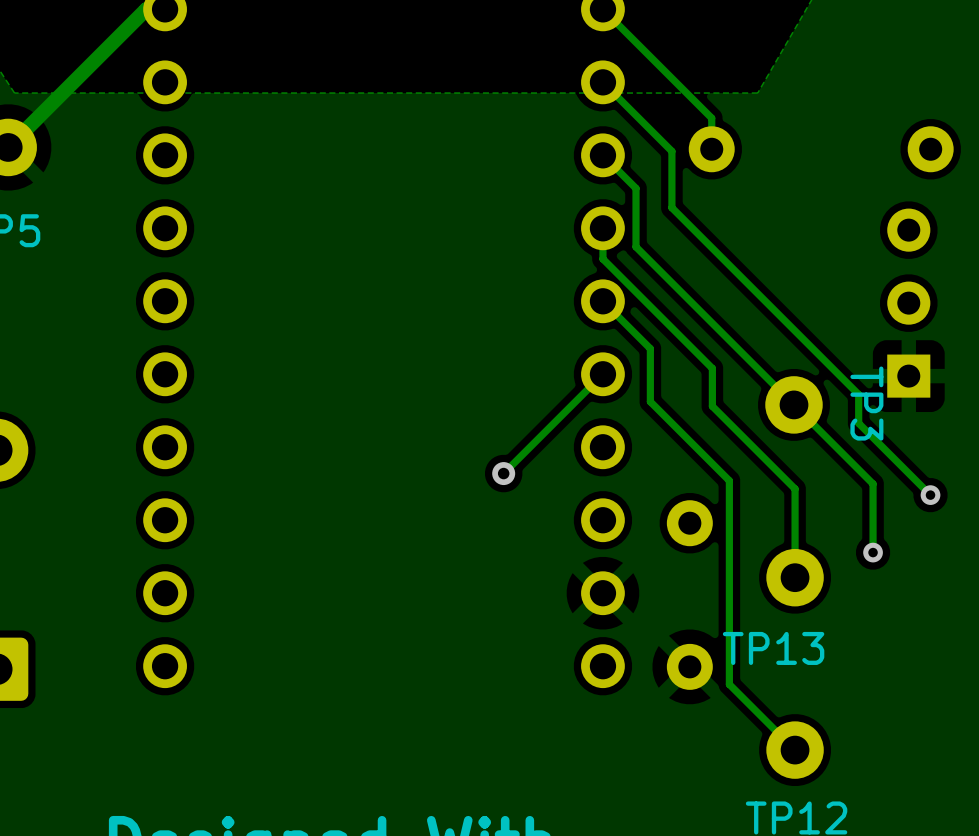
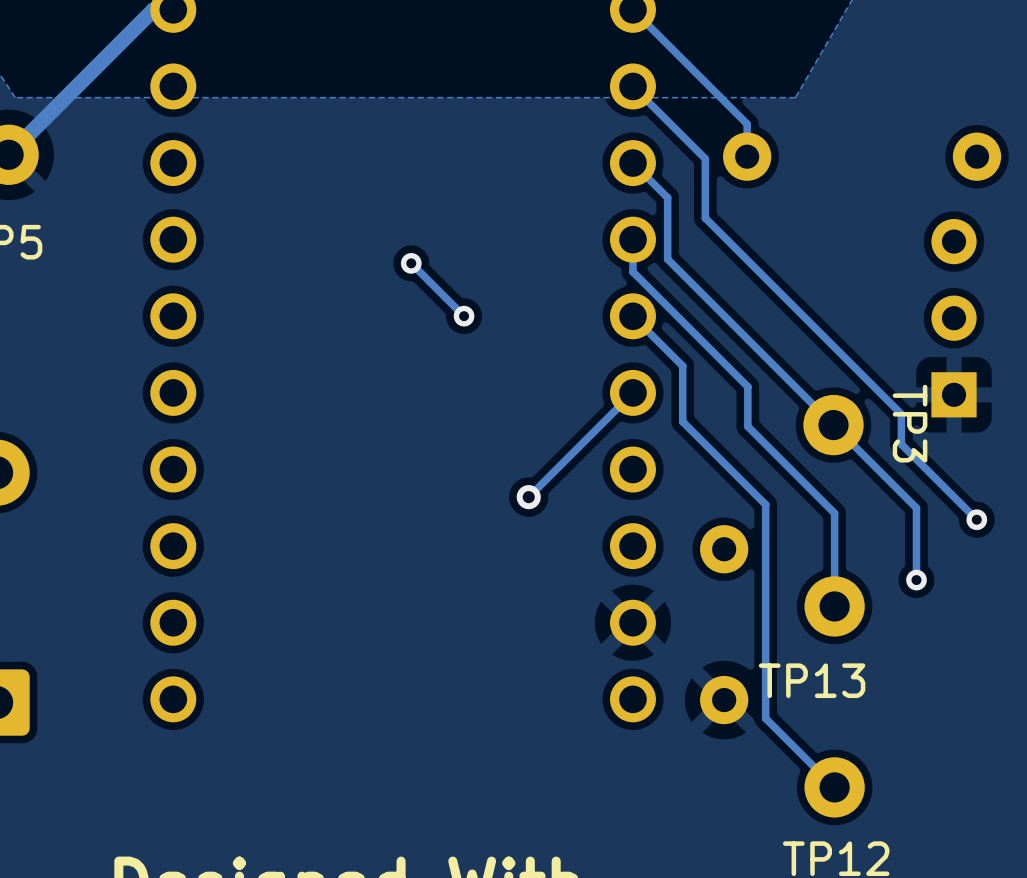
track: none -> (411, 263) (464, 316)
via: none -> (411, 263)
via: none -> (464, 316)

